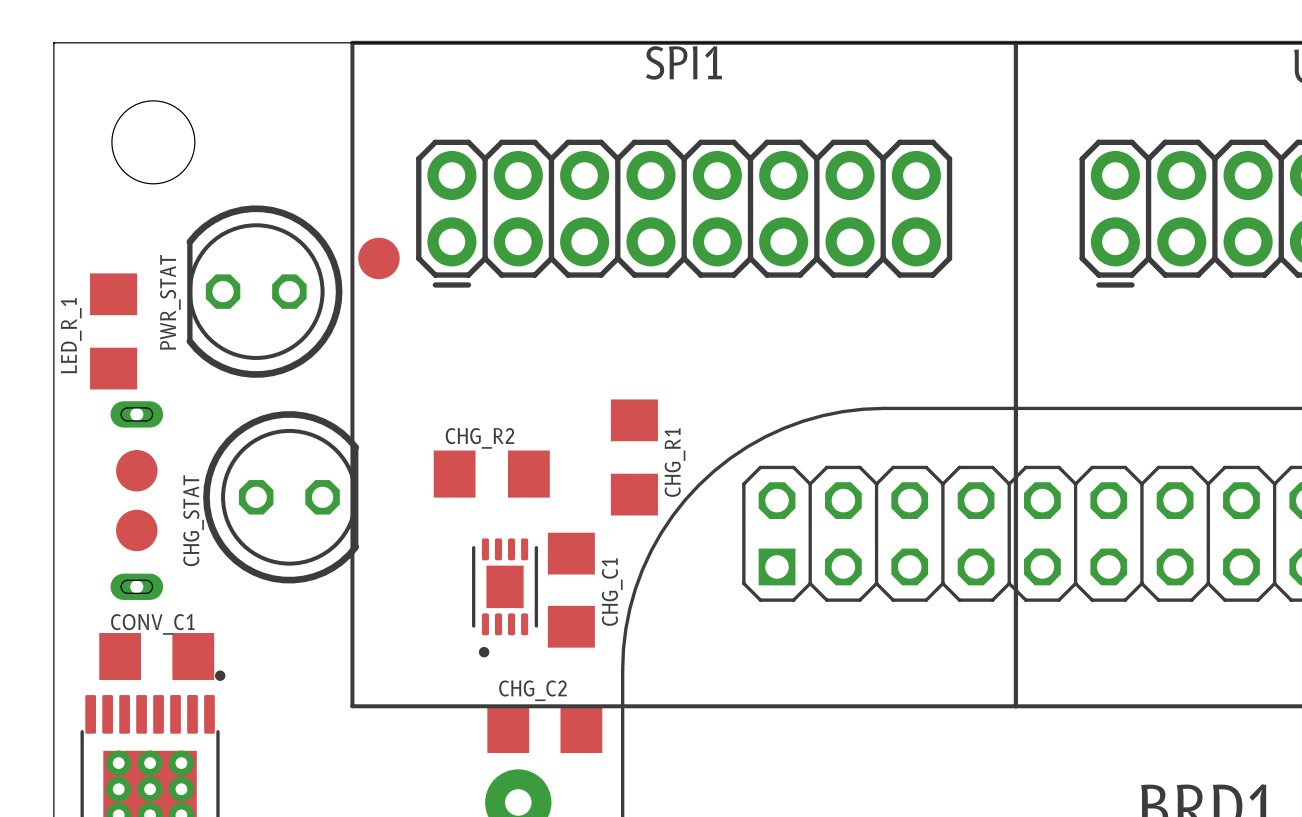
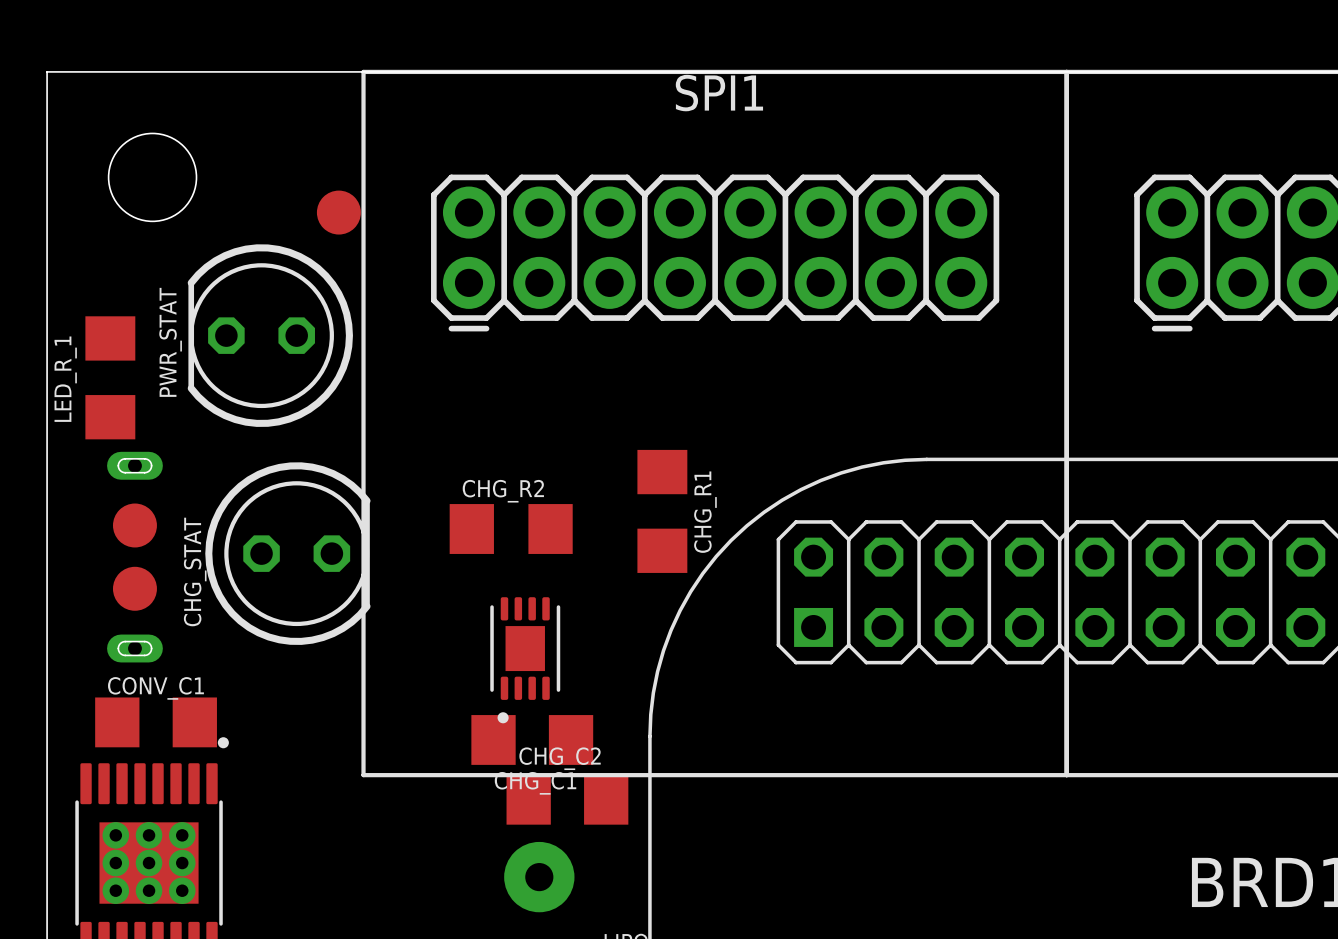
part position: (378, 258) -> (338, 212)
CHG_C1 rotation: 0° (571, 590) -> 90° clockwise (532, 739)
CHG_C1 position: (571, 590) -> (532, 739)

